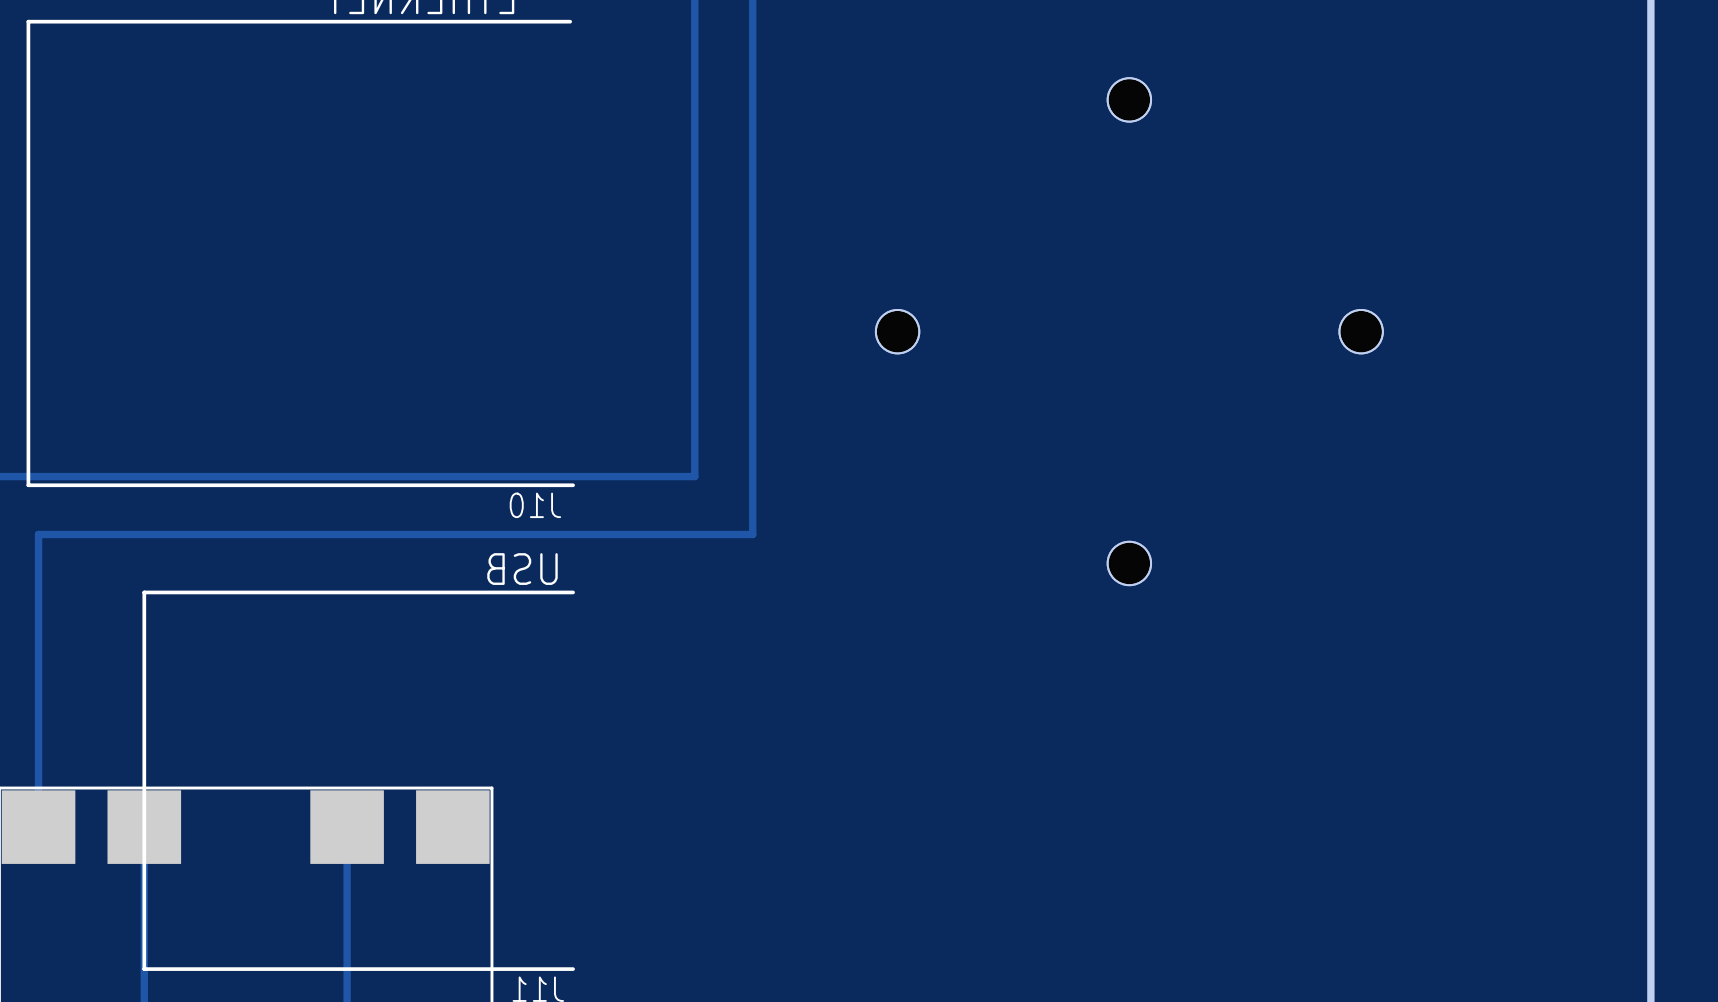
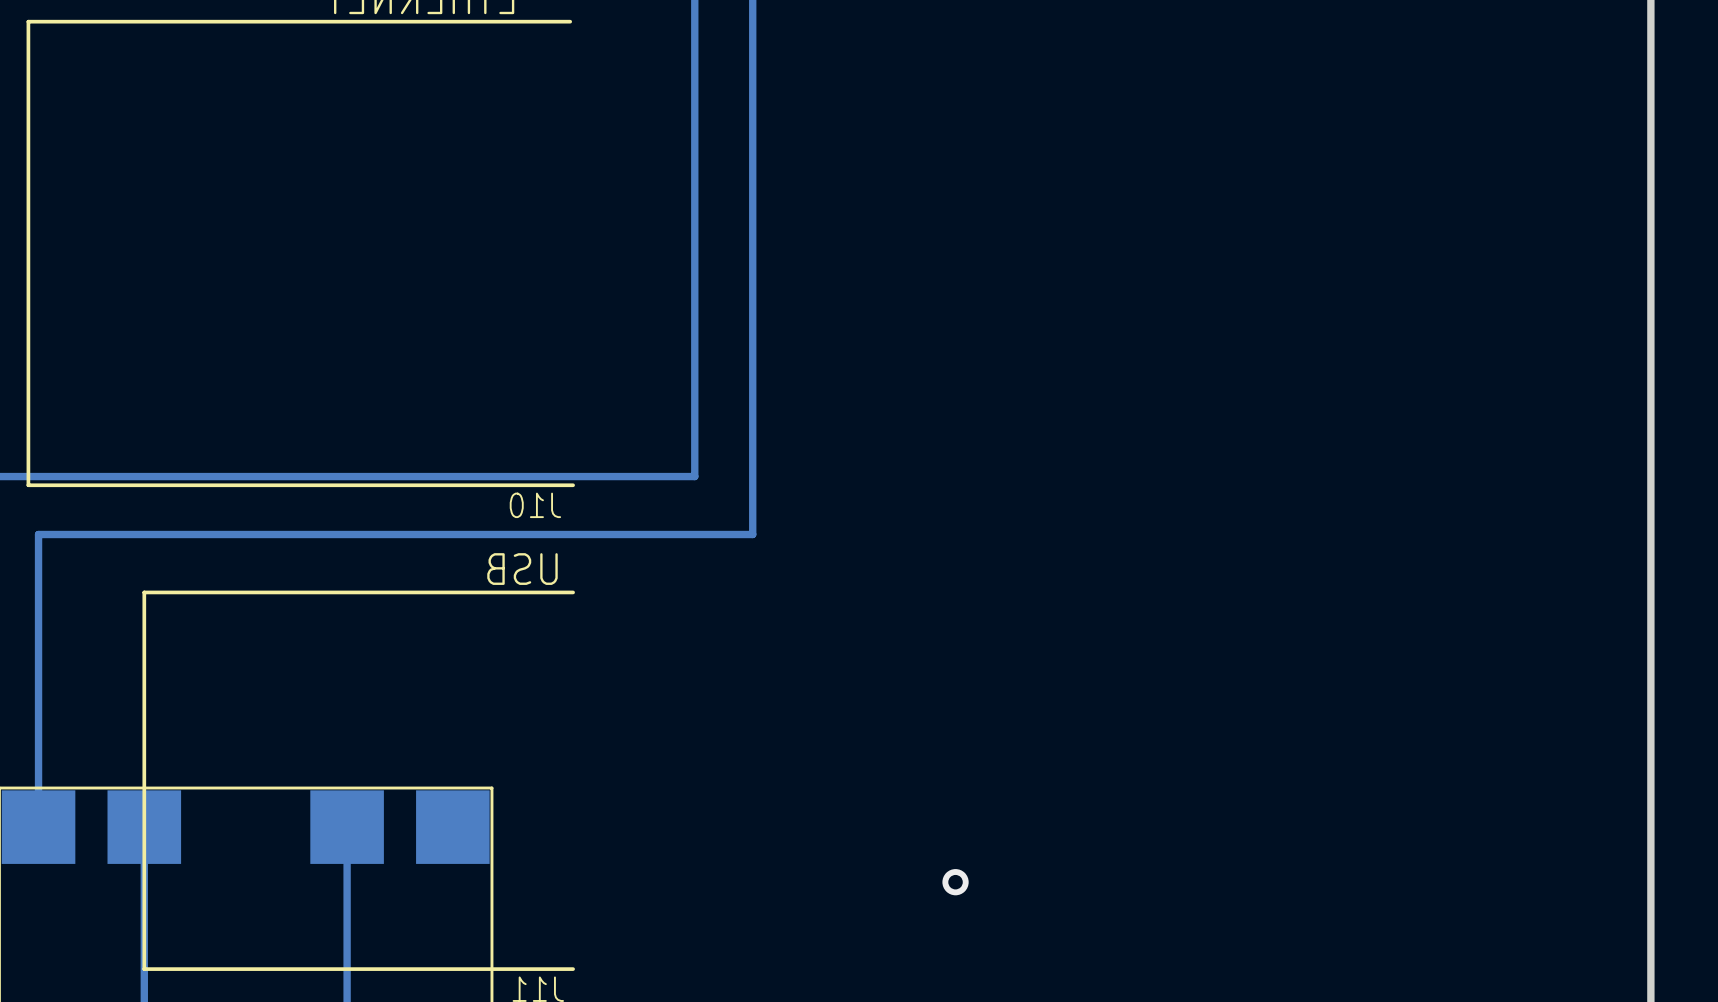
part: (1129, 99) -> none
part: (897, 331) -> none
part: (1361, 331) -> none
part: (1129, 563) -> none
via: none -> (955, 882)

